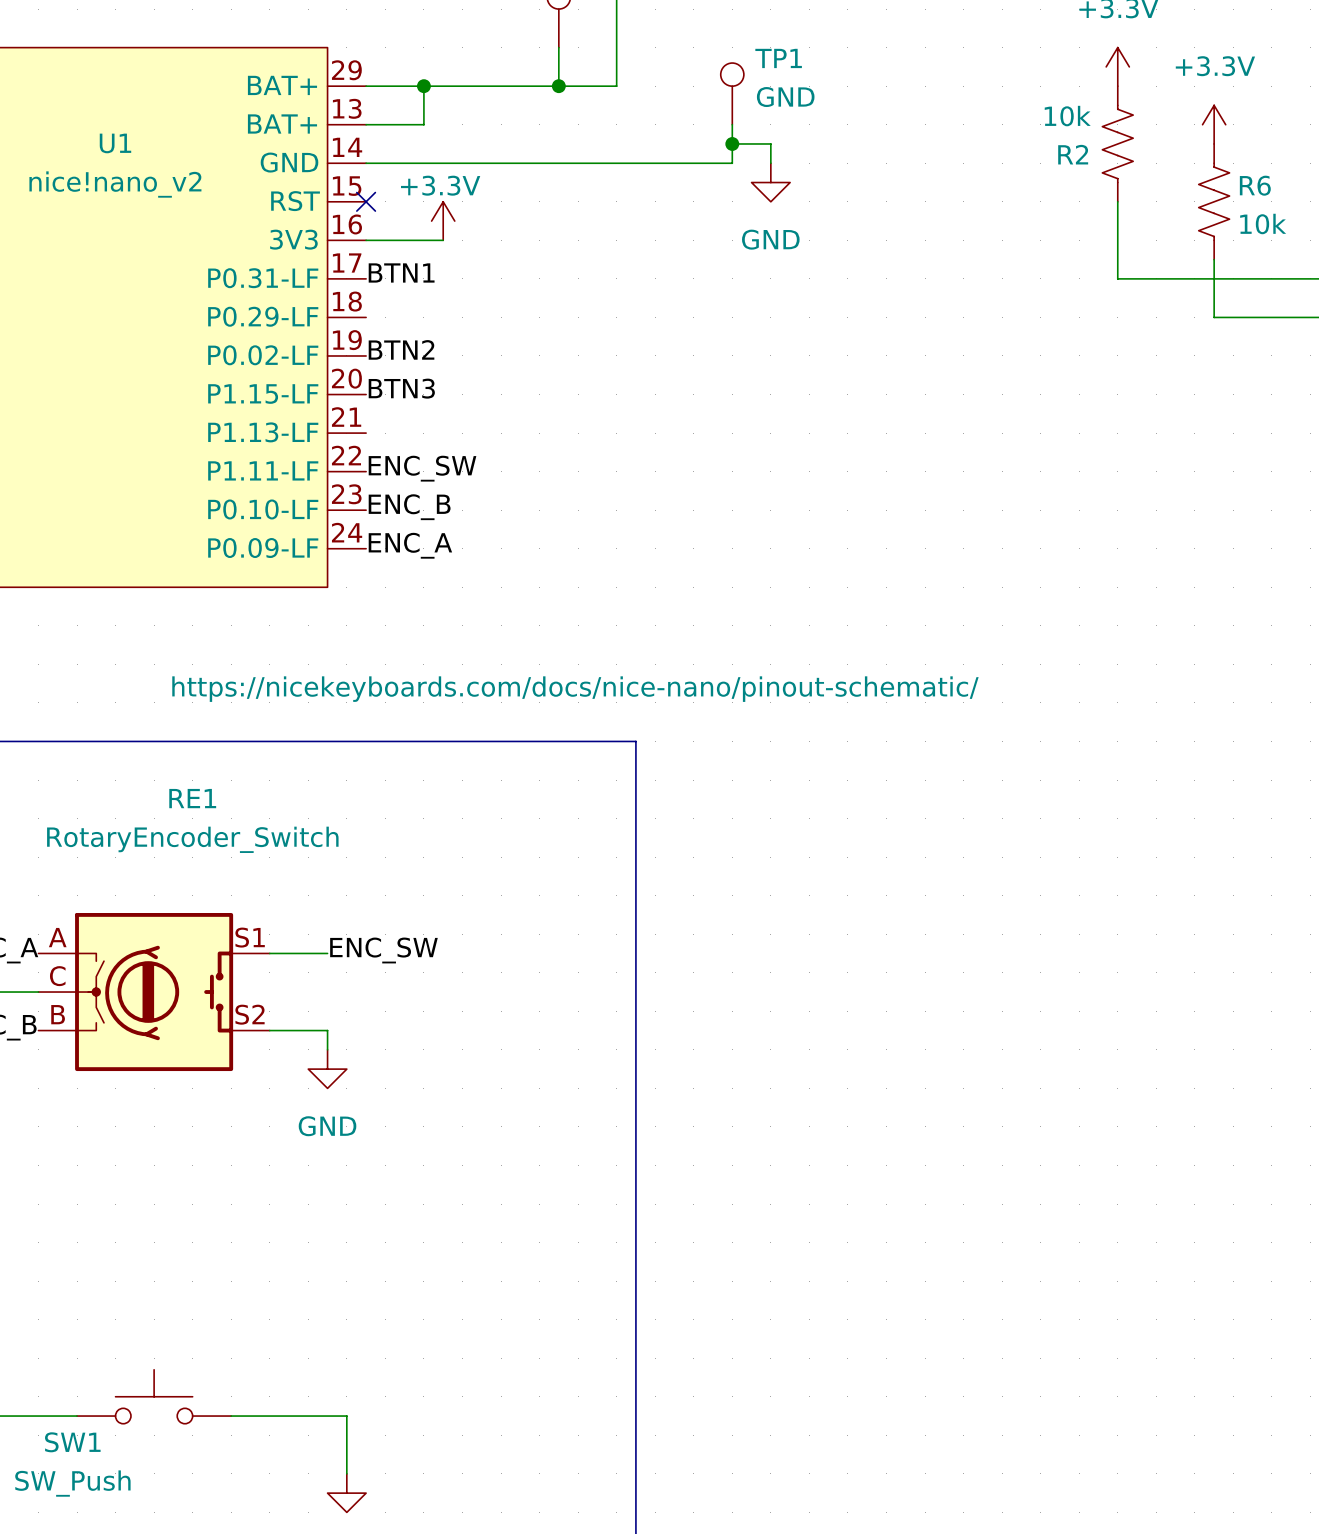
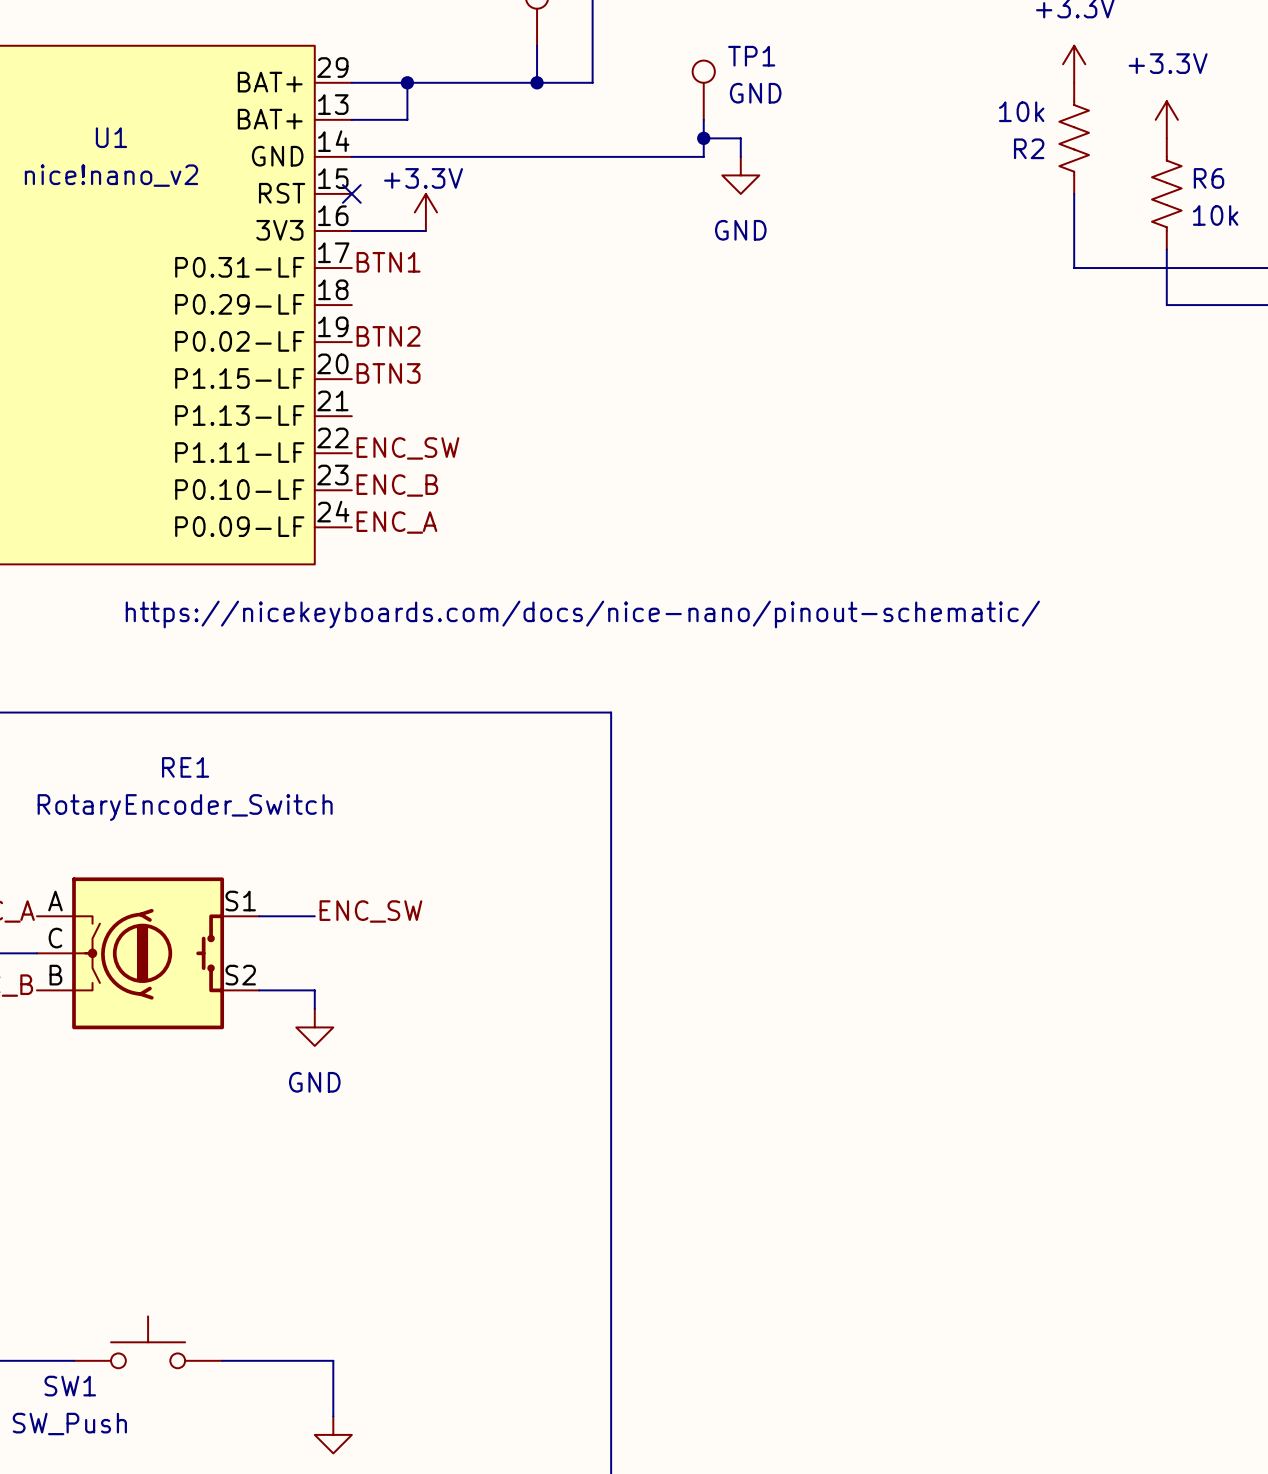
U1 text position: https://nicekeyboards.com/docs/nice-nano/pinout-schematic/ (575, 689) -> https://nicekeyboards.com/docs/nice-nano/pinout-schematic/ (582, 614)

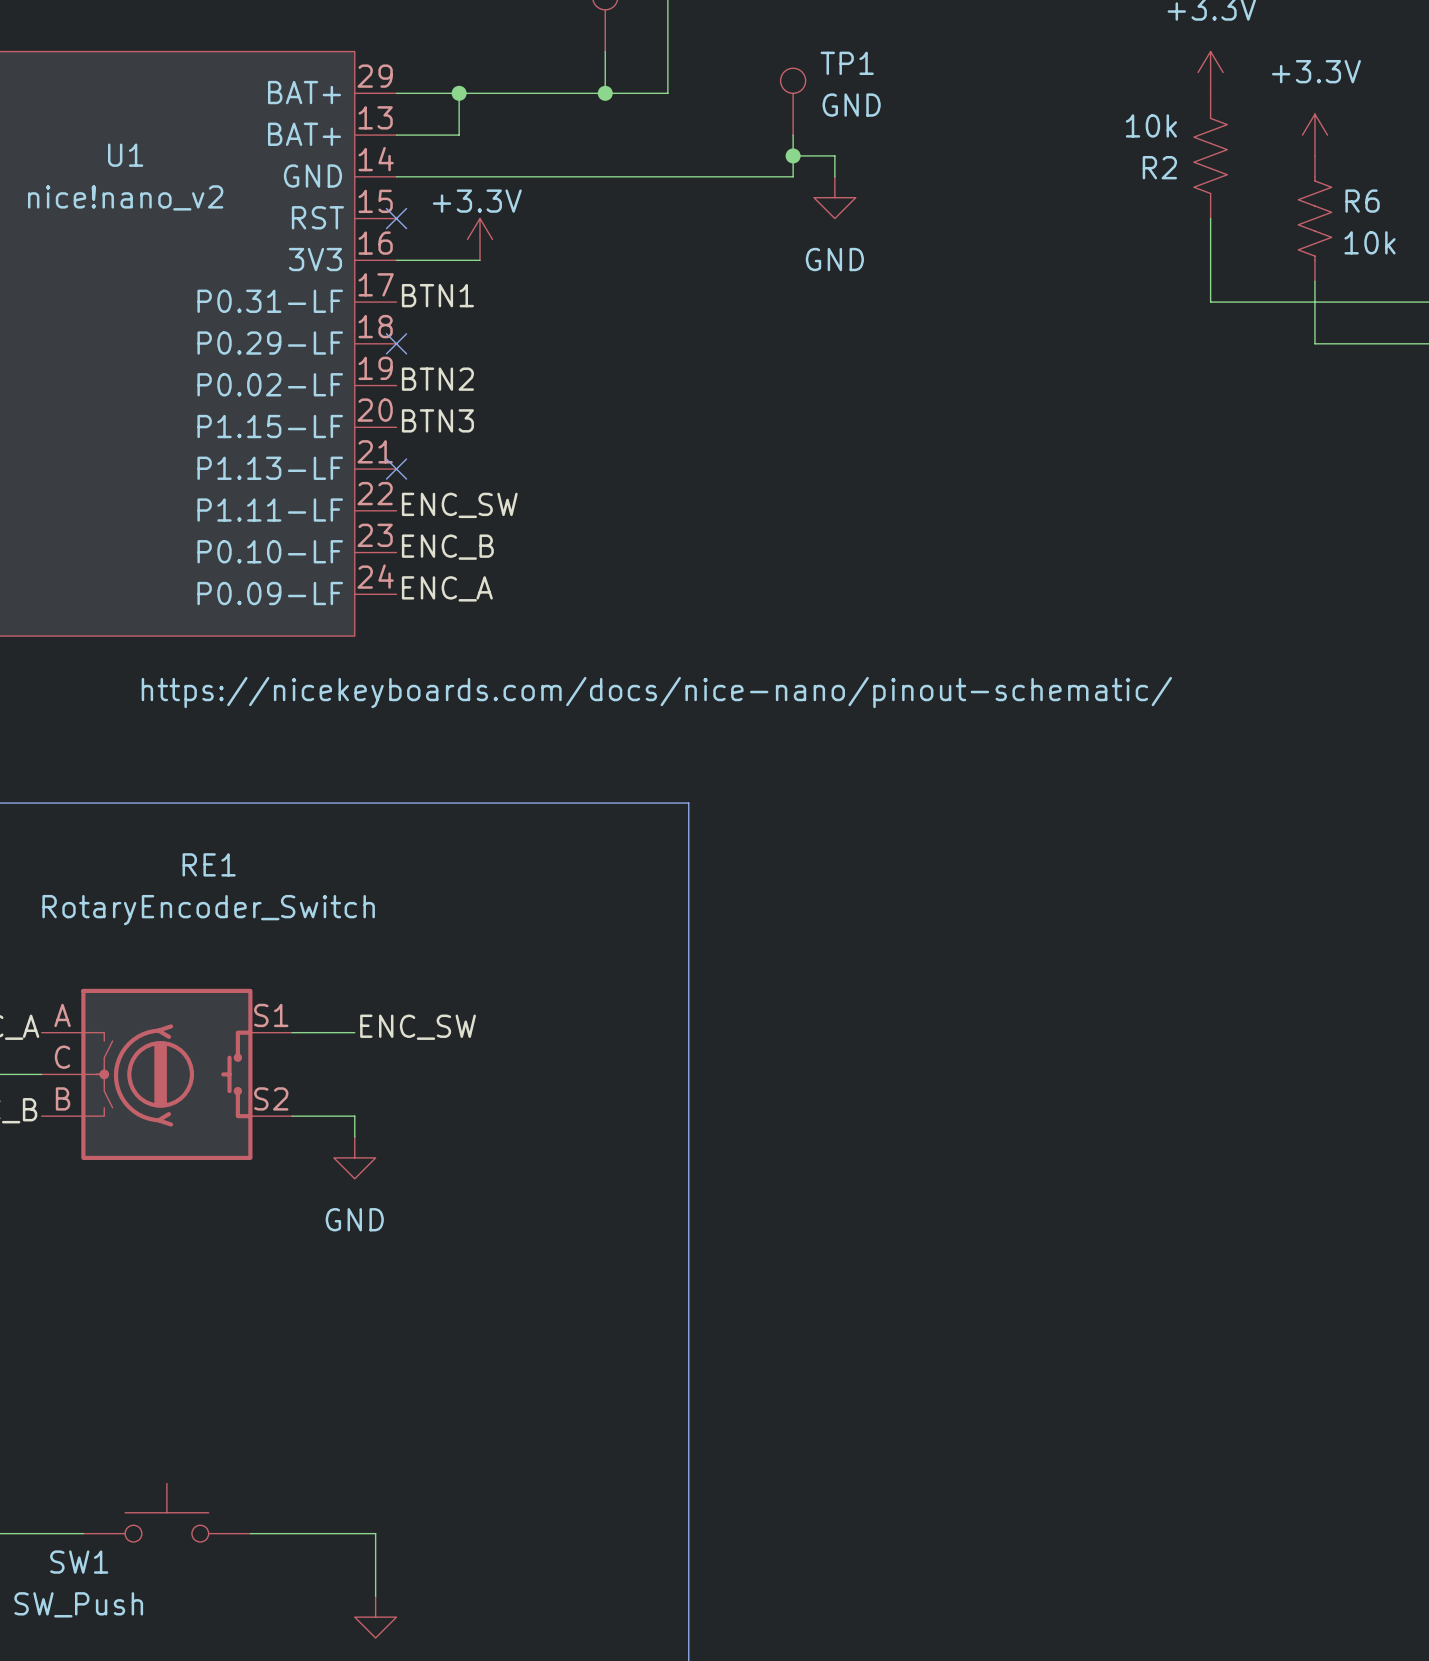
no-connect mark: none -> (396, 343)
no-connect mark: none -> (396, 469)

